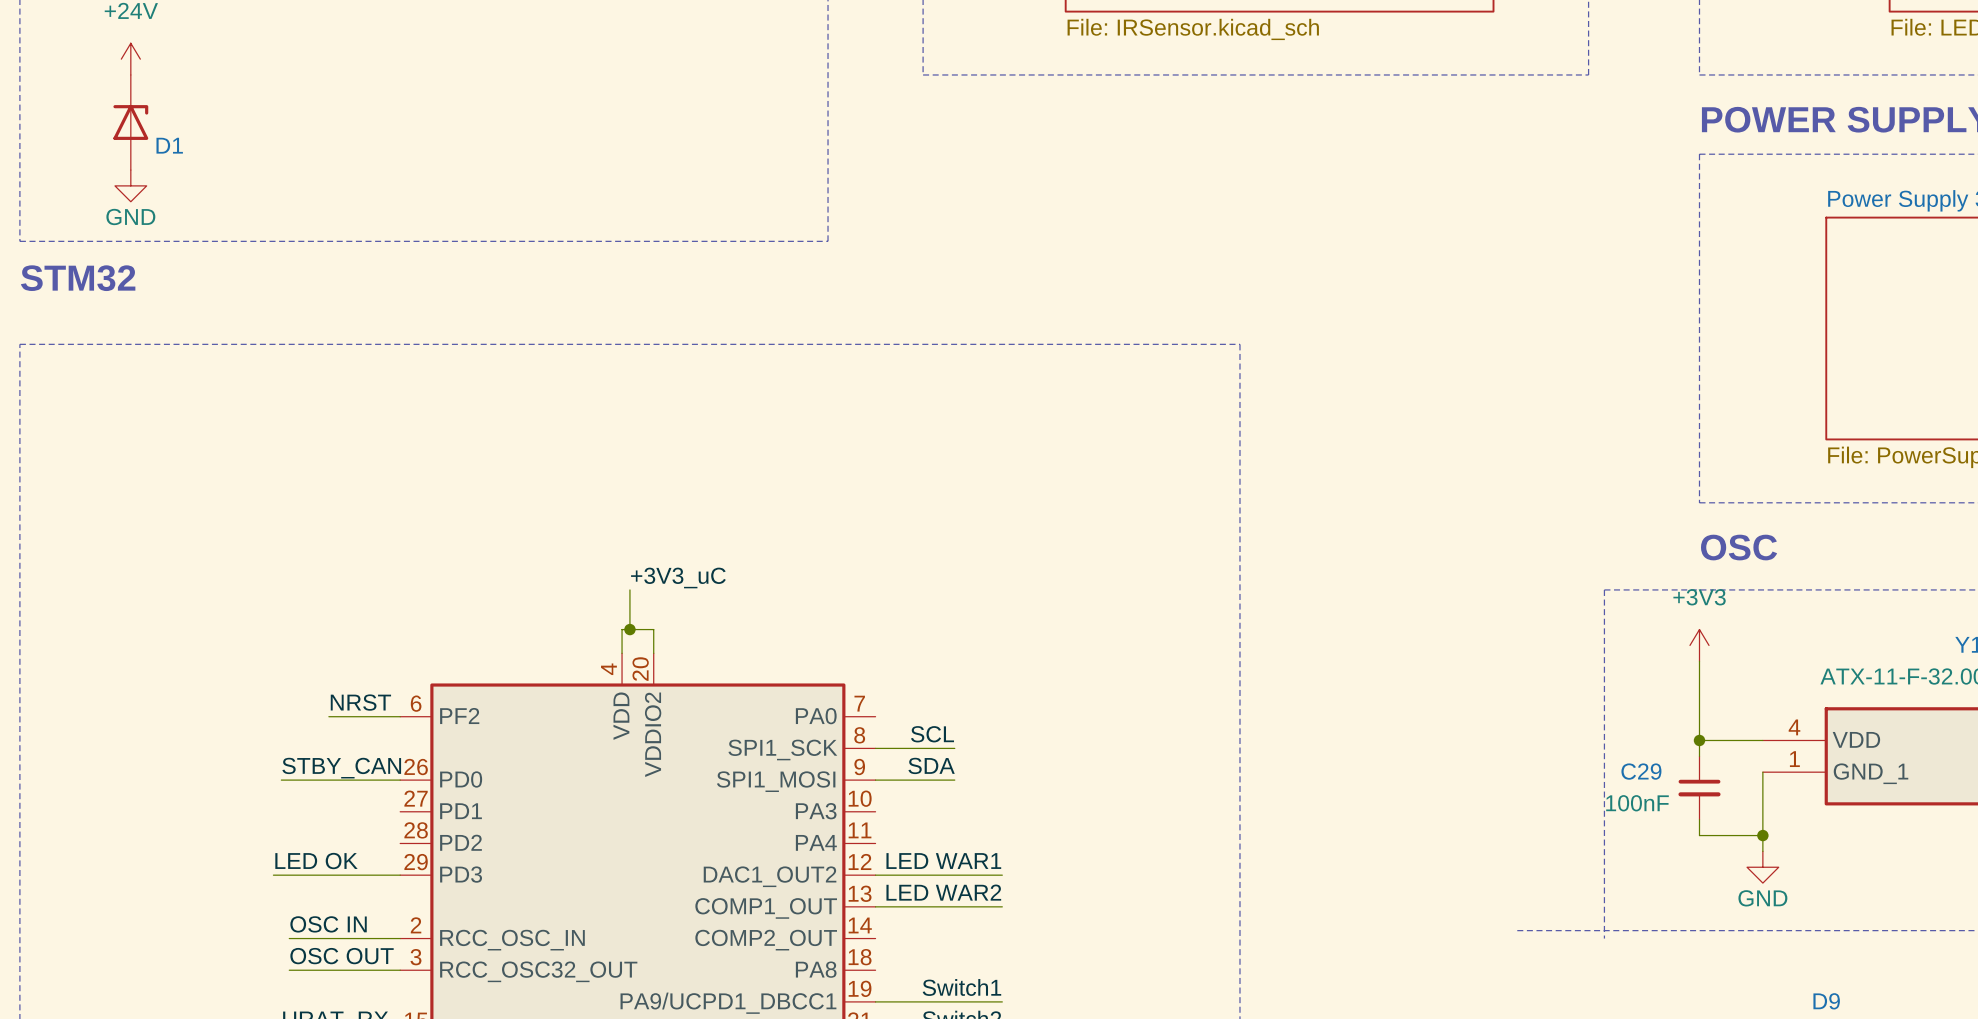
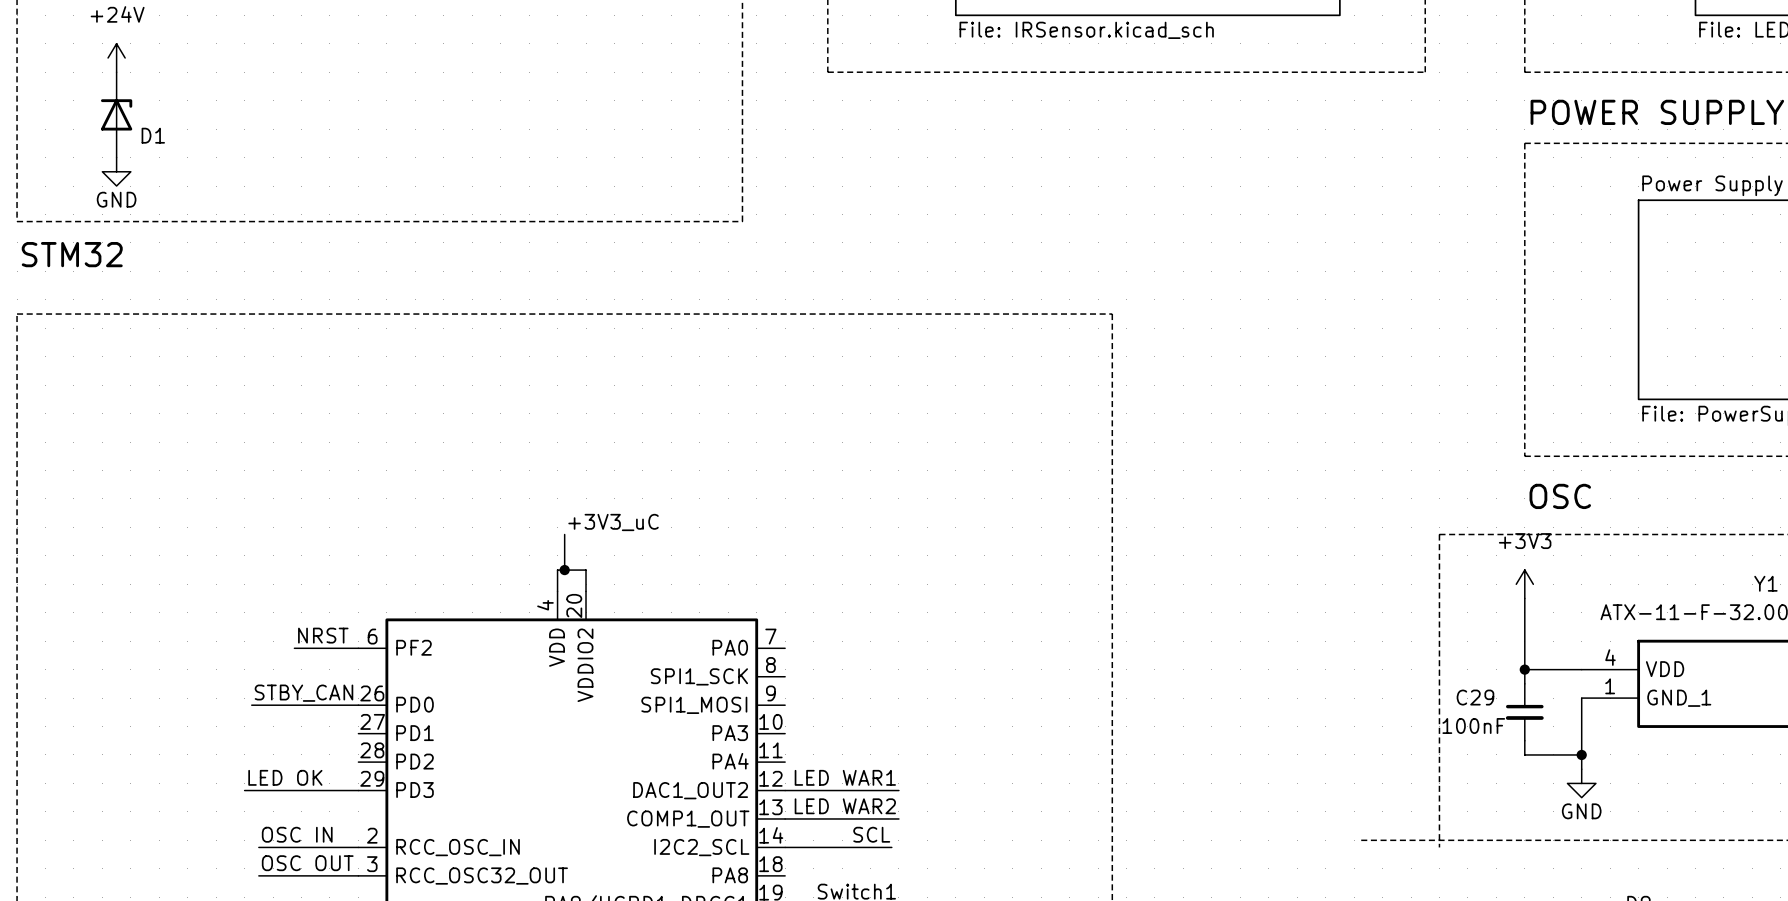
label position: SCL (932, 734) -> SCL (871, 834)
wire: (875, 748) (954, 748) -> none
label: SDA (931, 765) -> none
wire: (875, 780) (954, 780) -> none
wire: none -> (785, 847) (891, 847)
part pin name: COMP2_OUT (766, 940) -> I2C2_SCL (701, 847)

